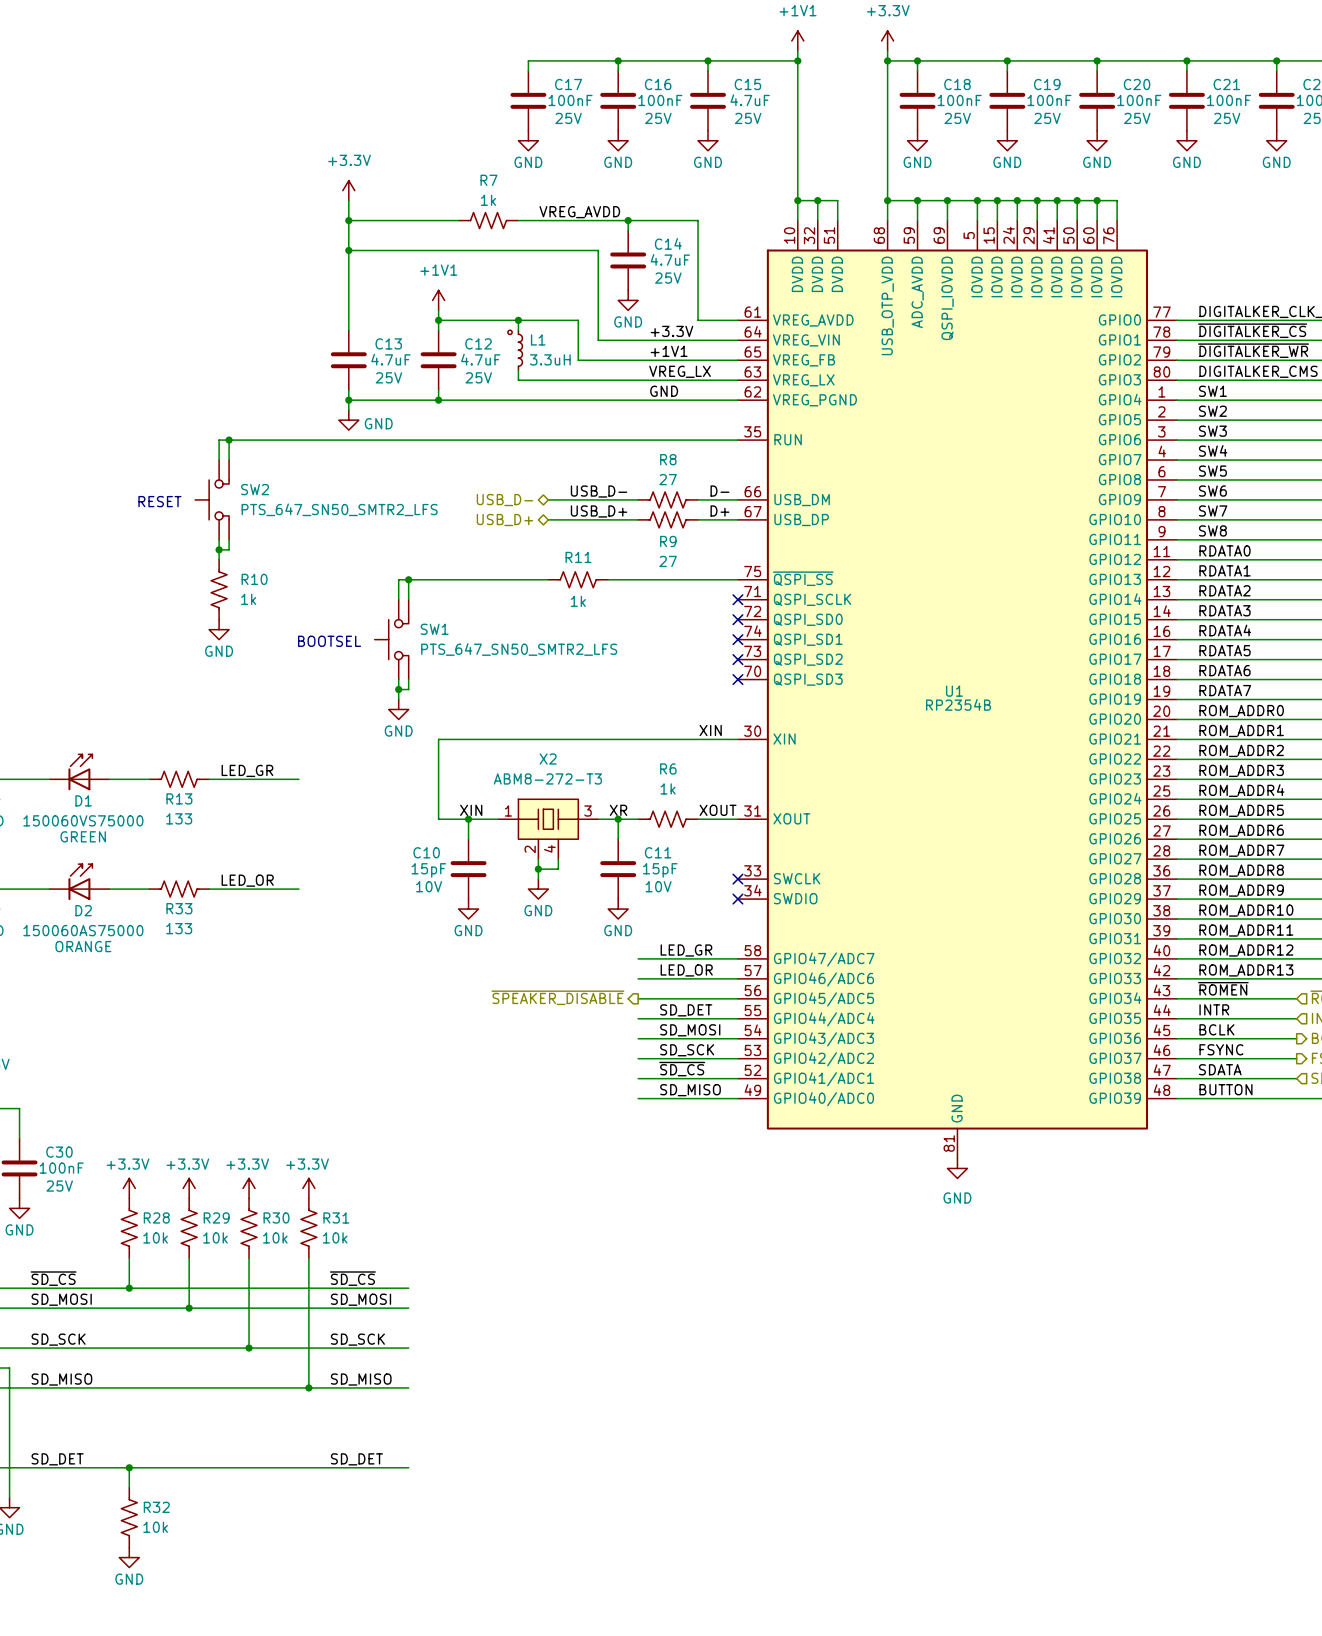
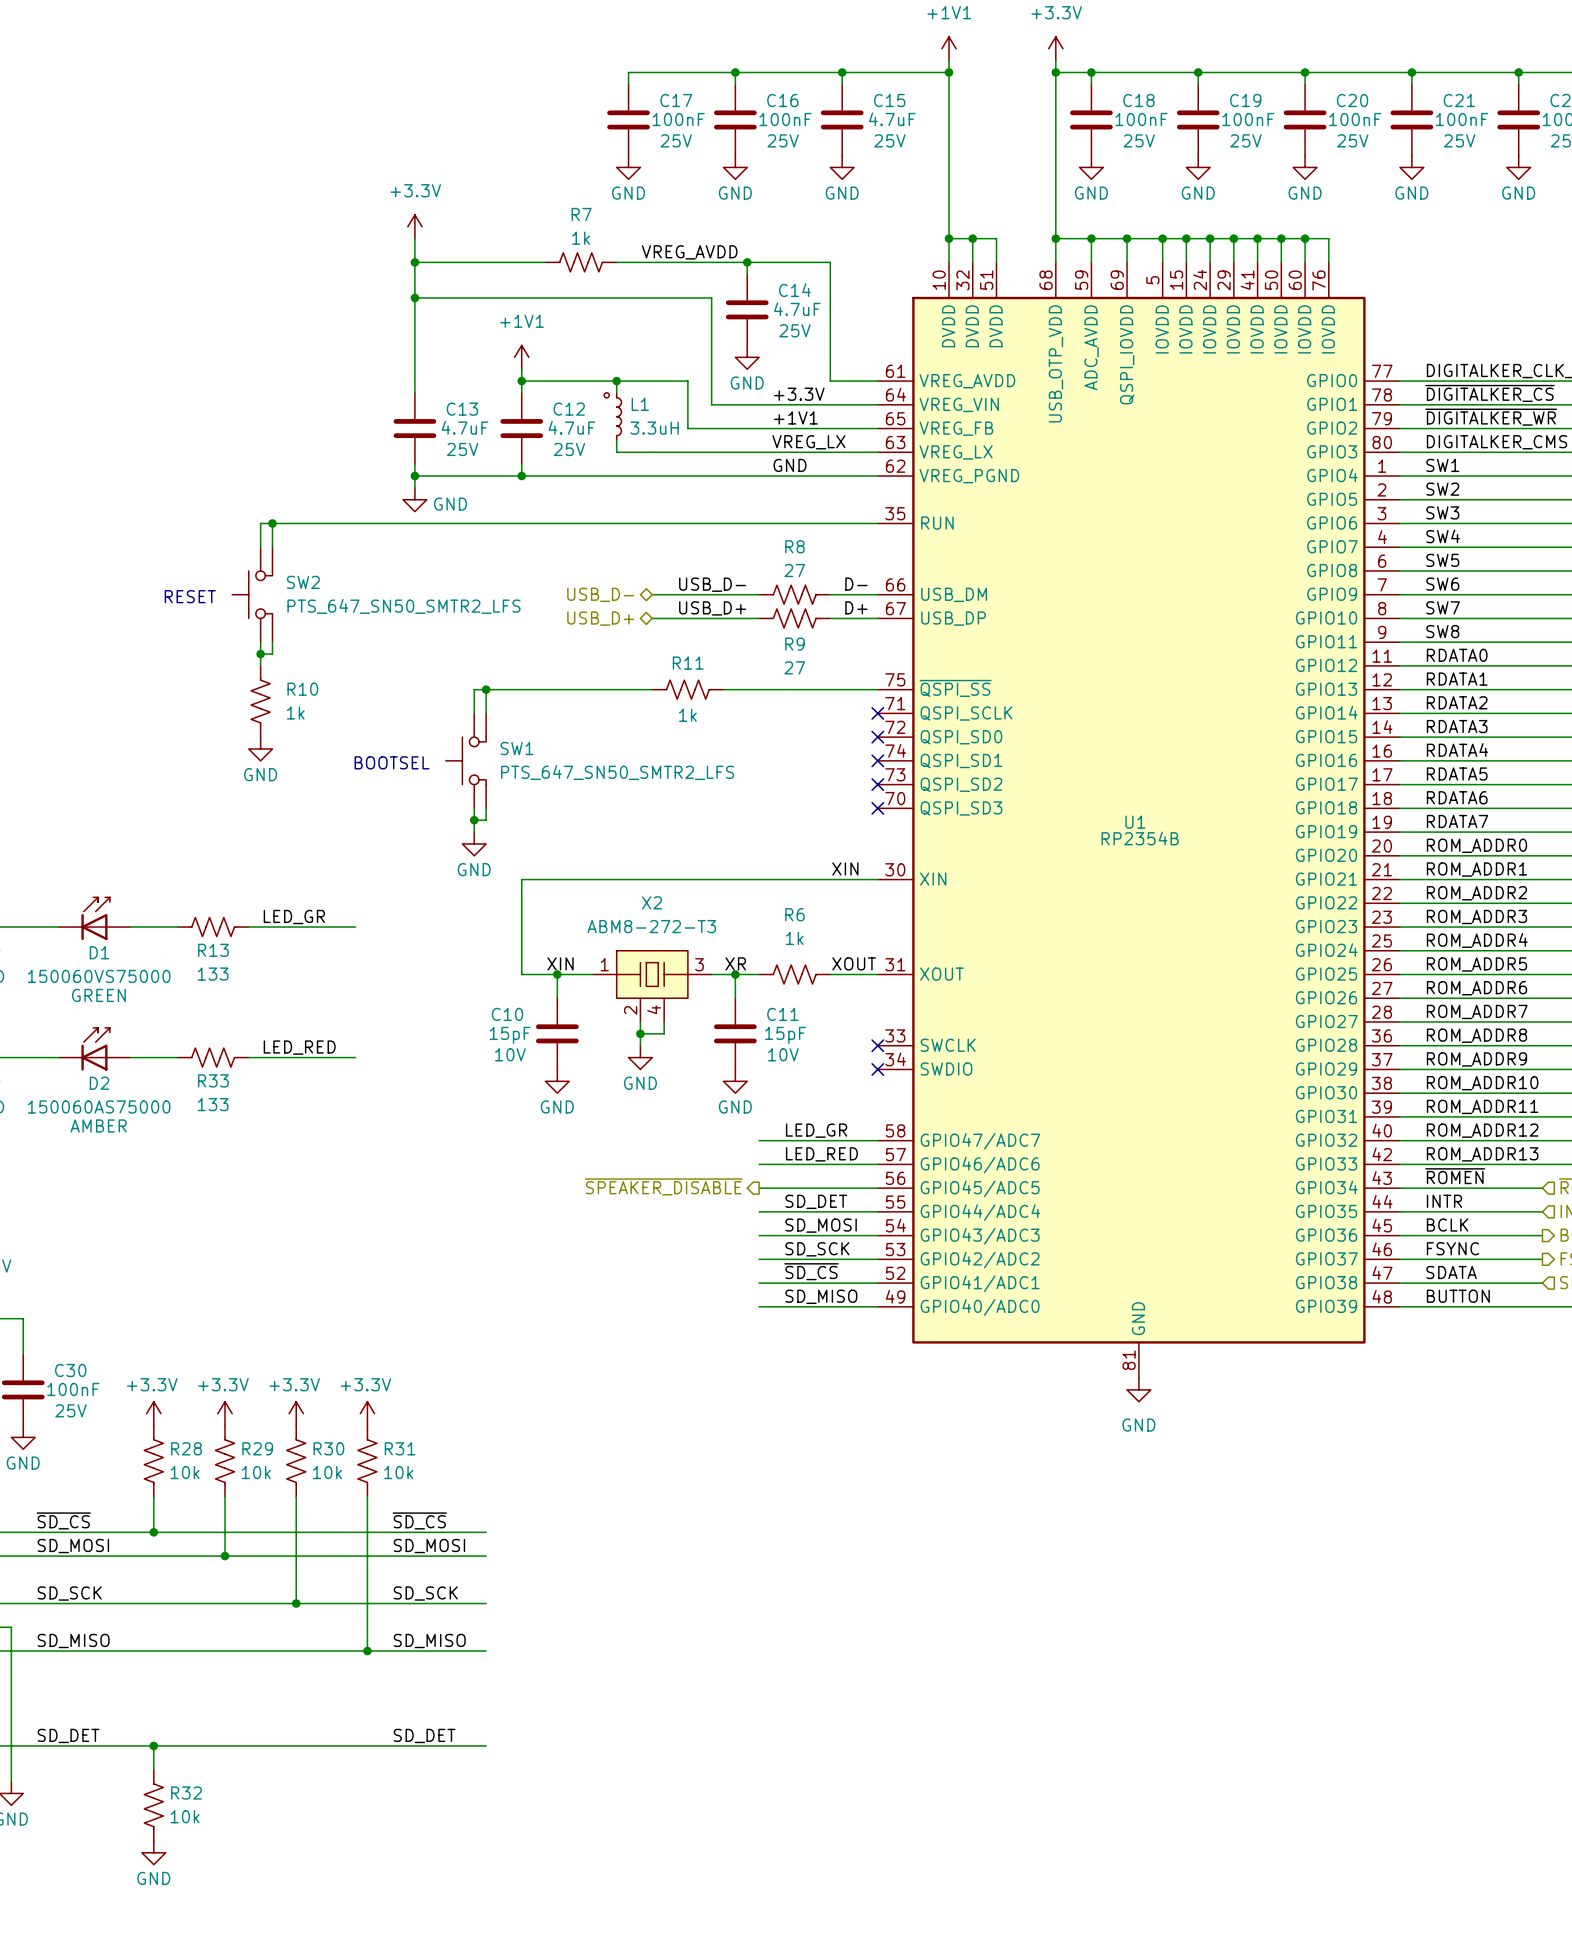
label: LED_OR (247, 880) -> LED_RED (299, 1047)
D2 text: ORANGE (83, 946) -> AMBER (98, 1125)
label: LED_OR (686, 970) -> LED_RED (821, 1154)

